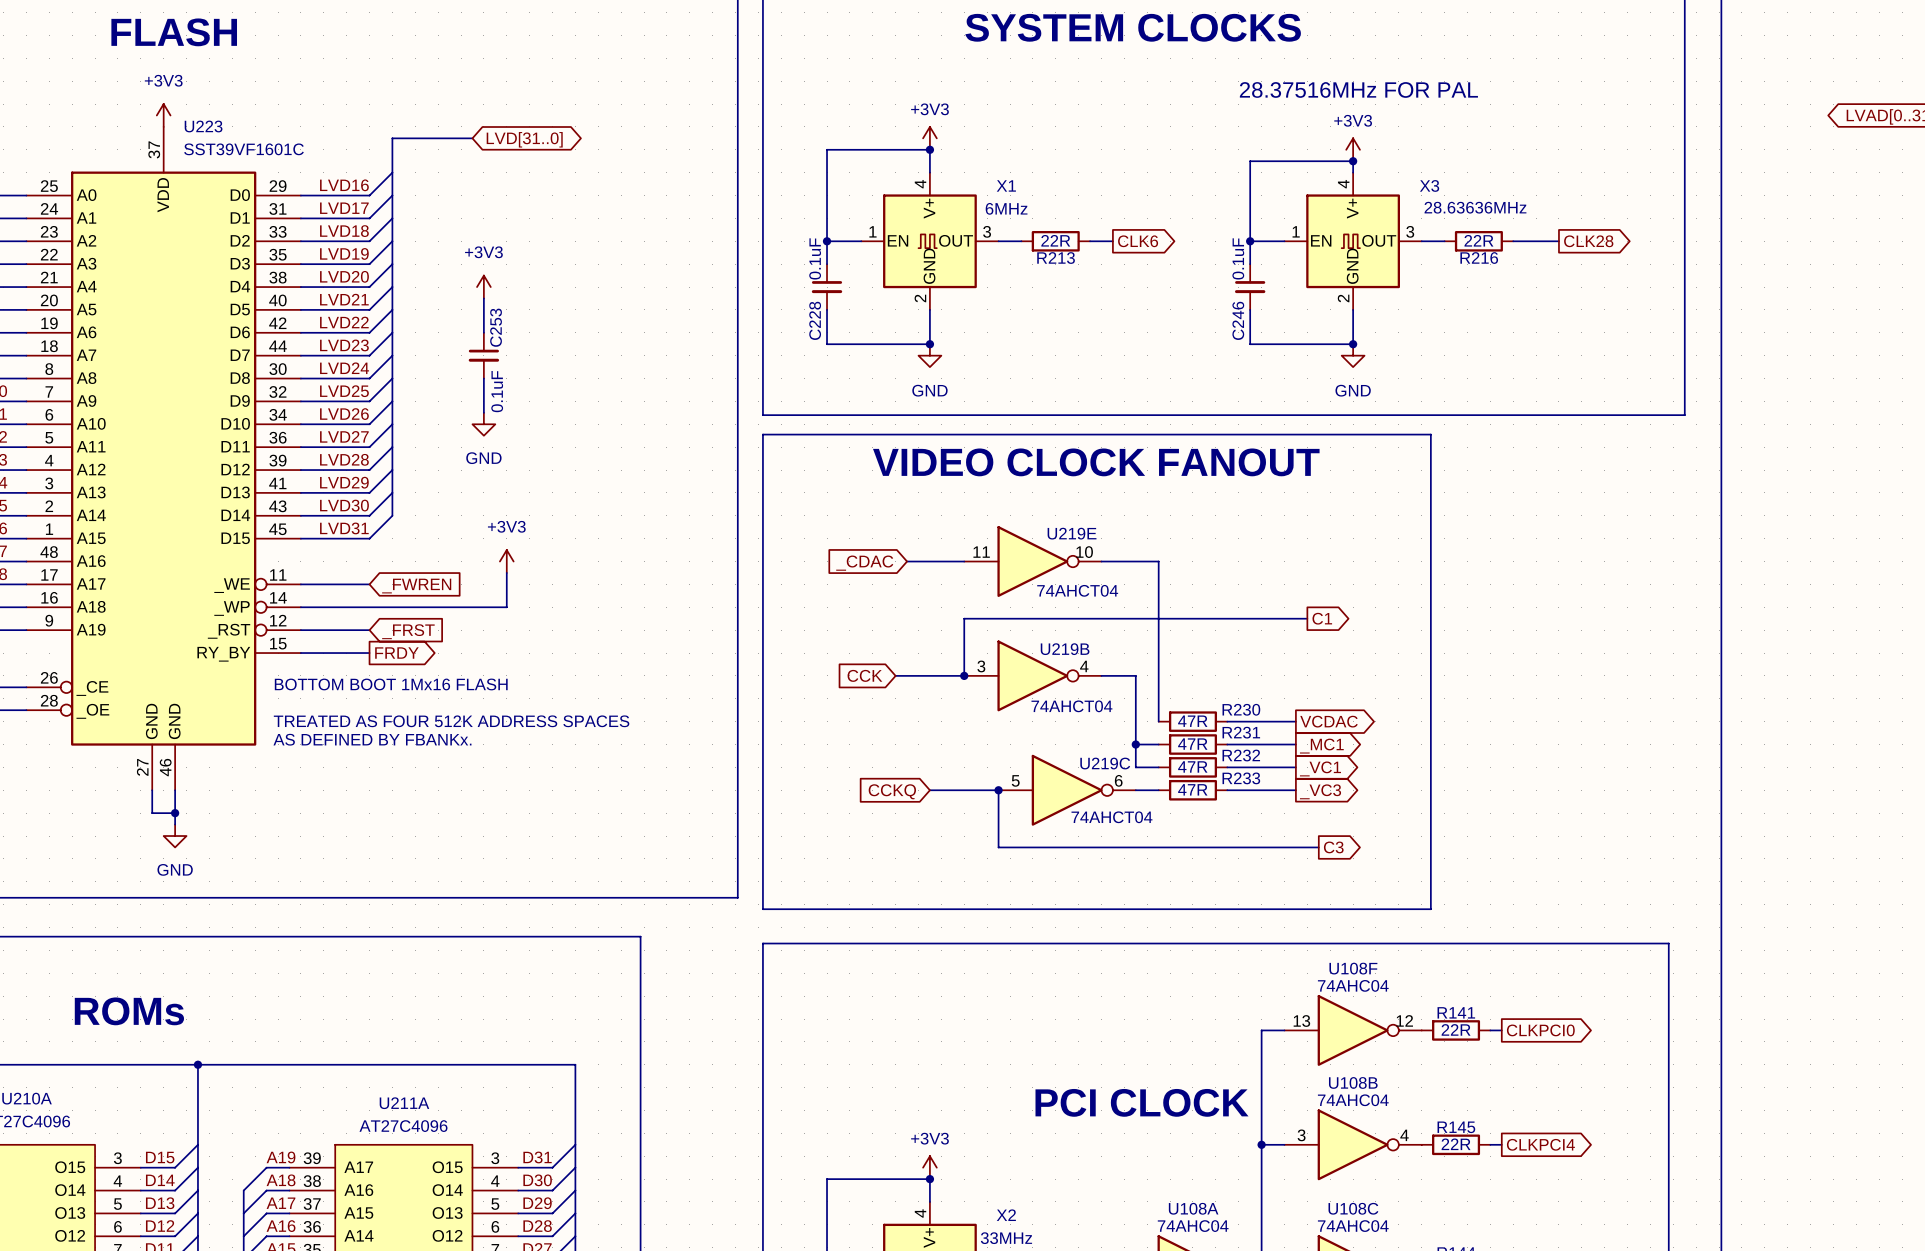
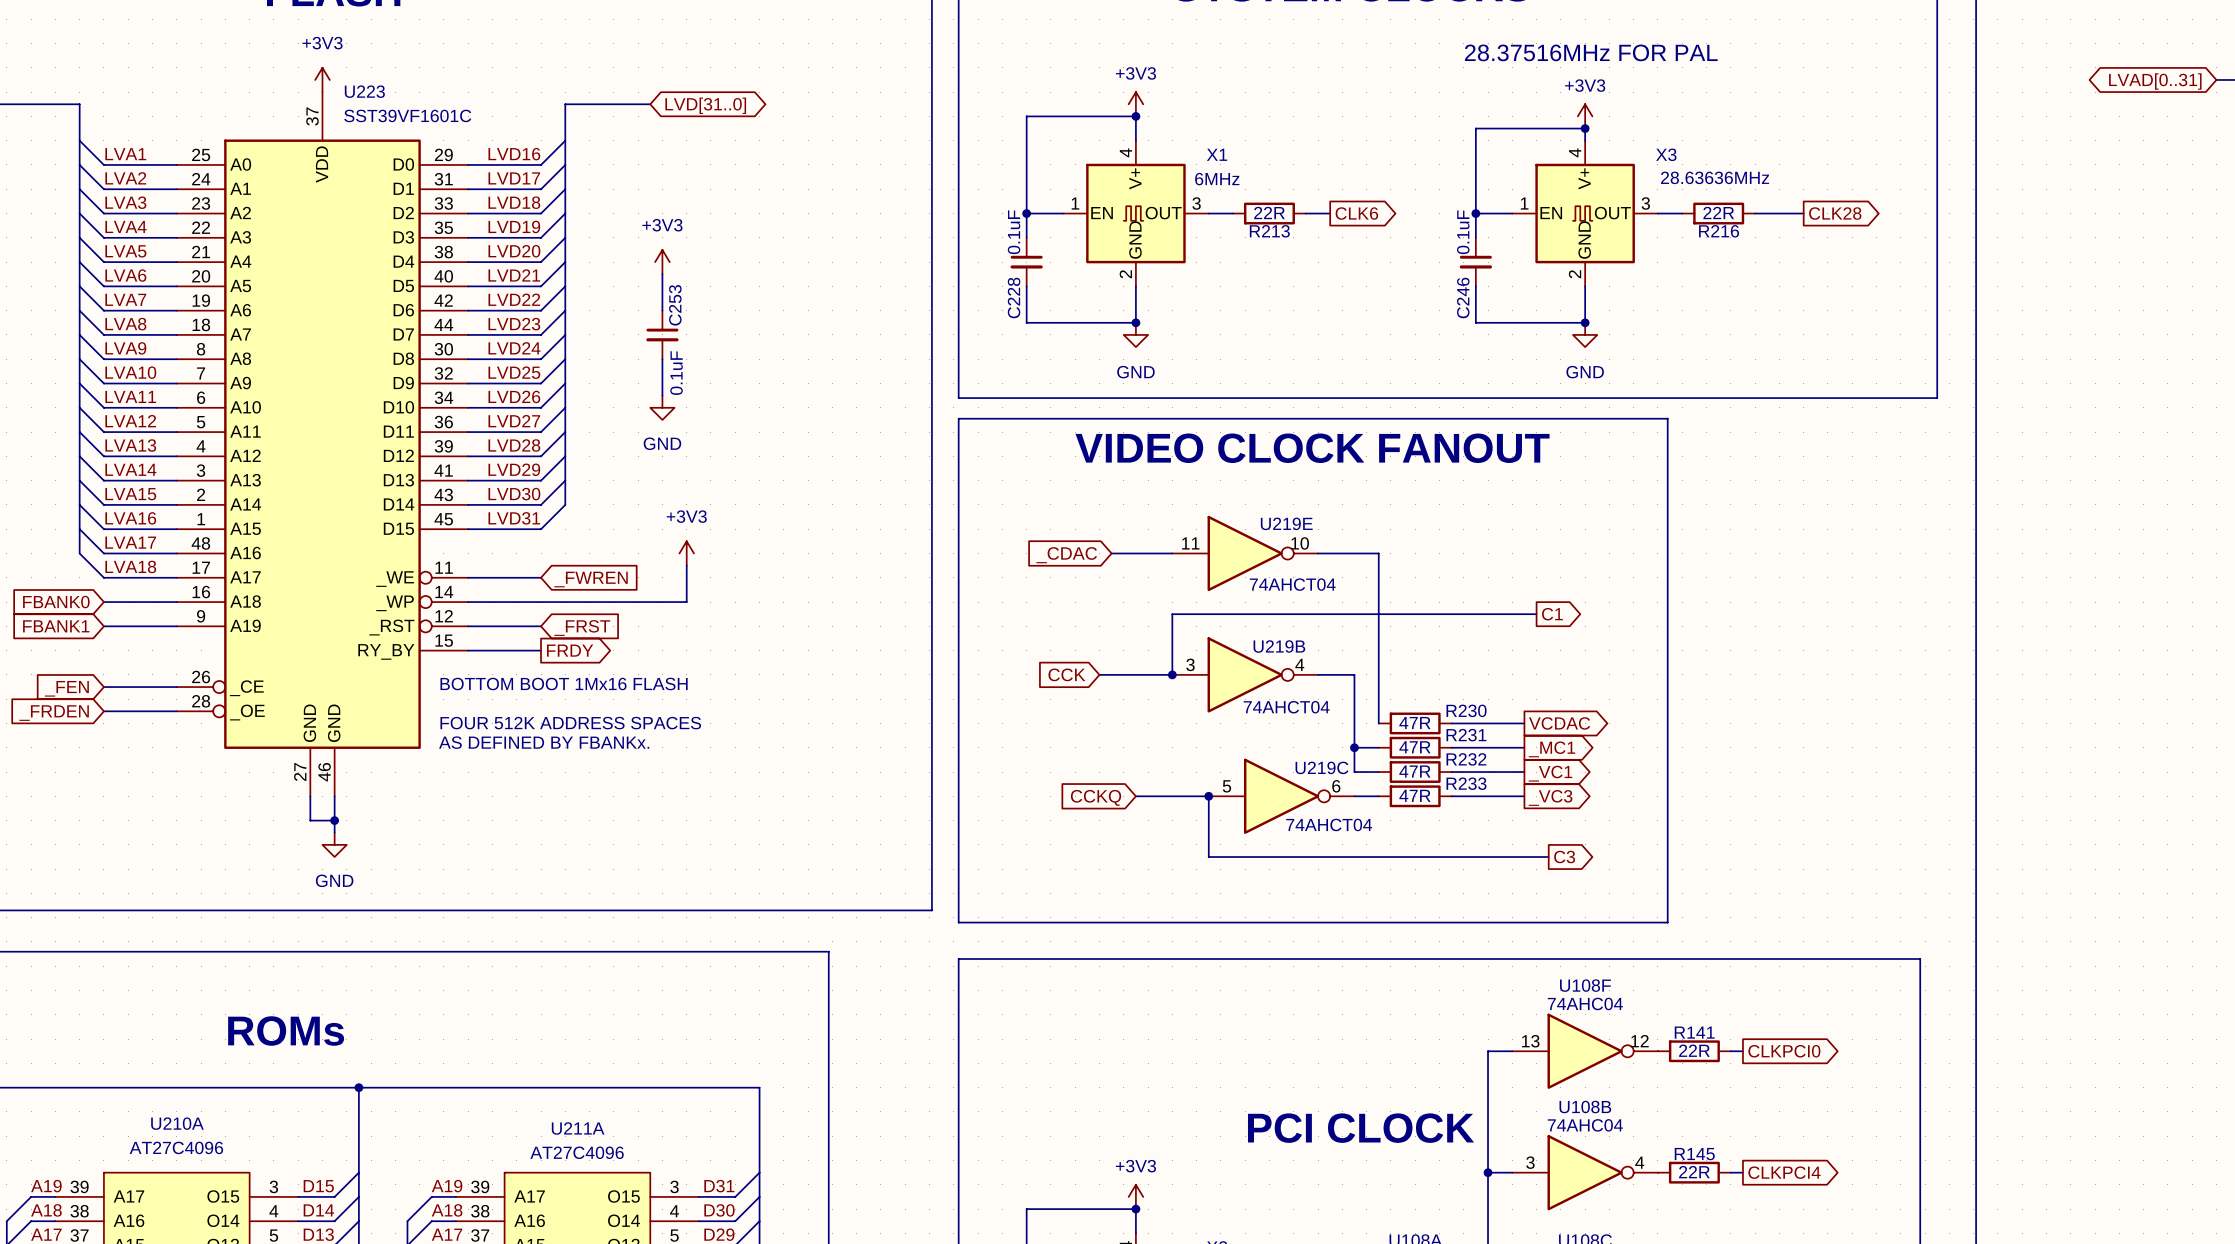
text: TREATED AS FOUR 512K ADDRESS SPACES (451, 721) -> FOUR 512K ADDRESS SPACES (570, 723)

